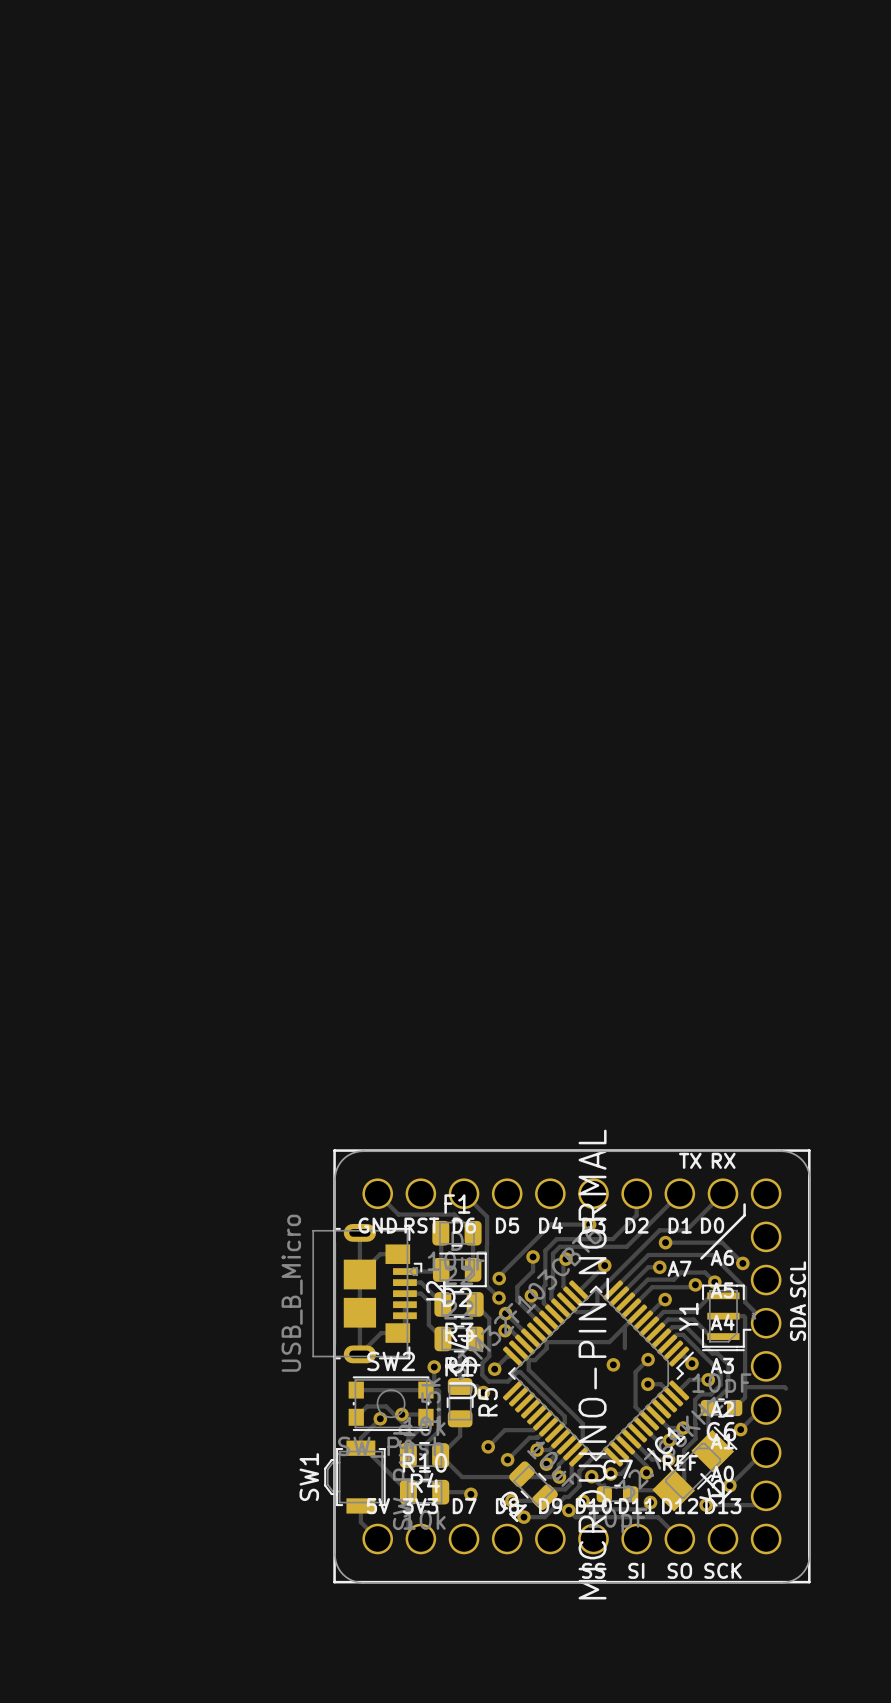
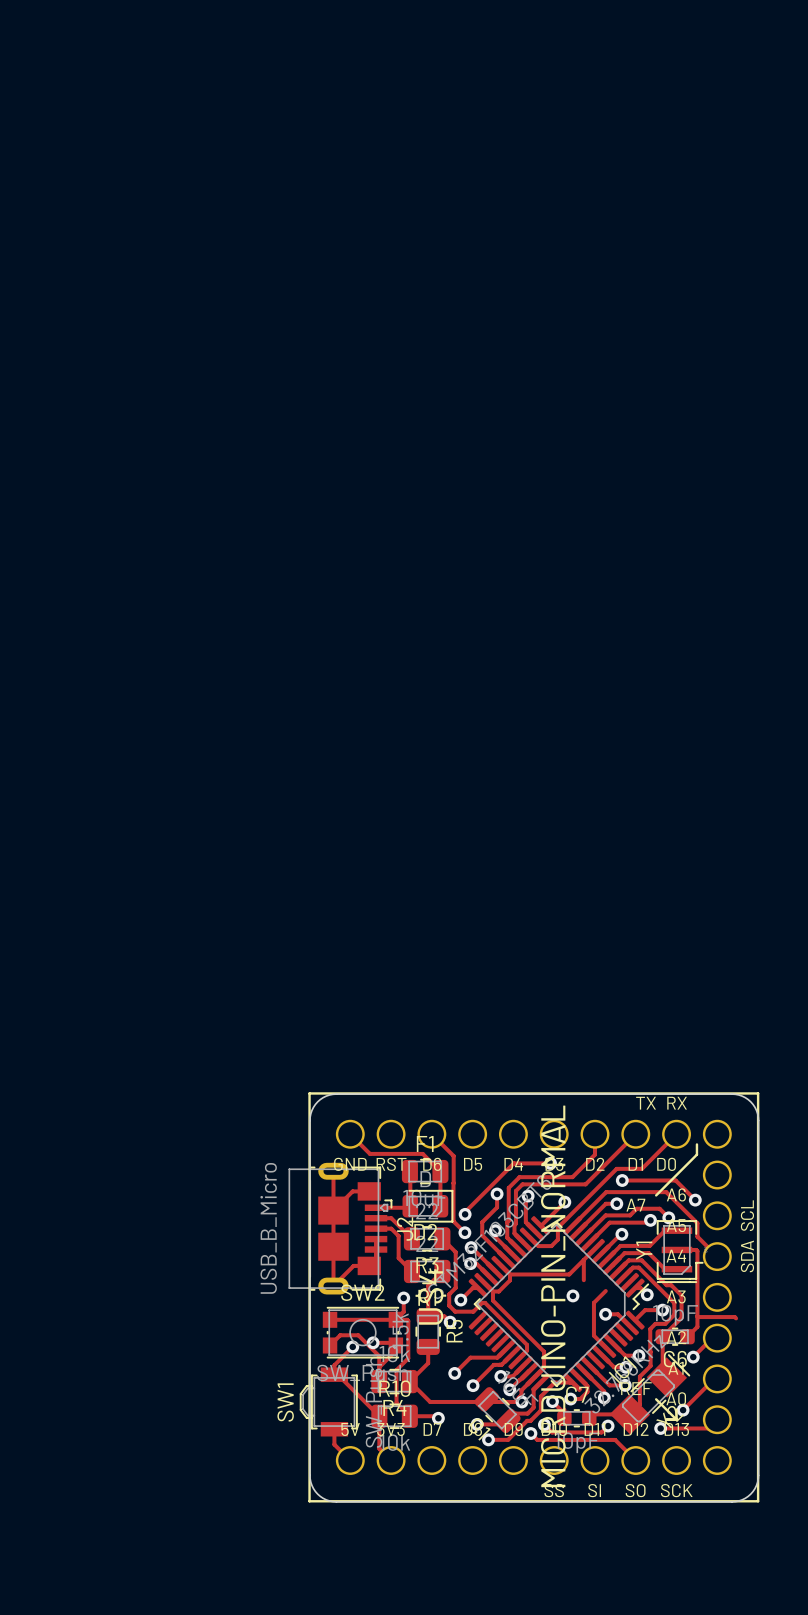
via: (648, 1359) -> none

